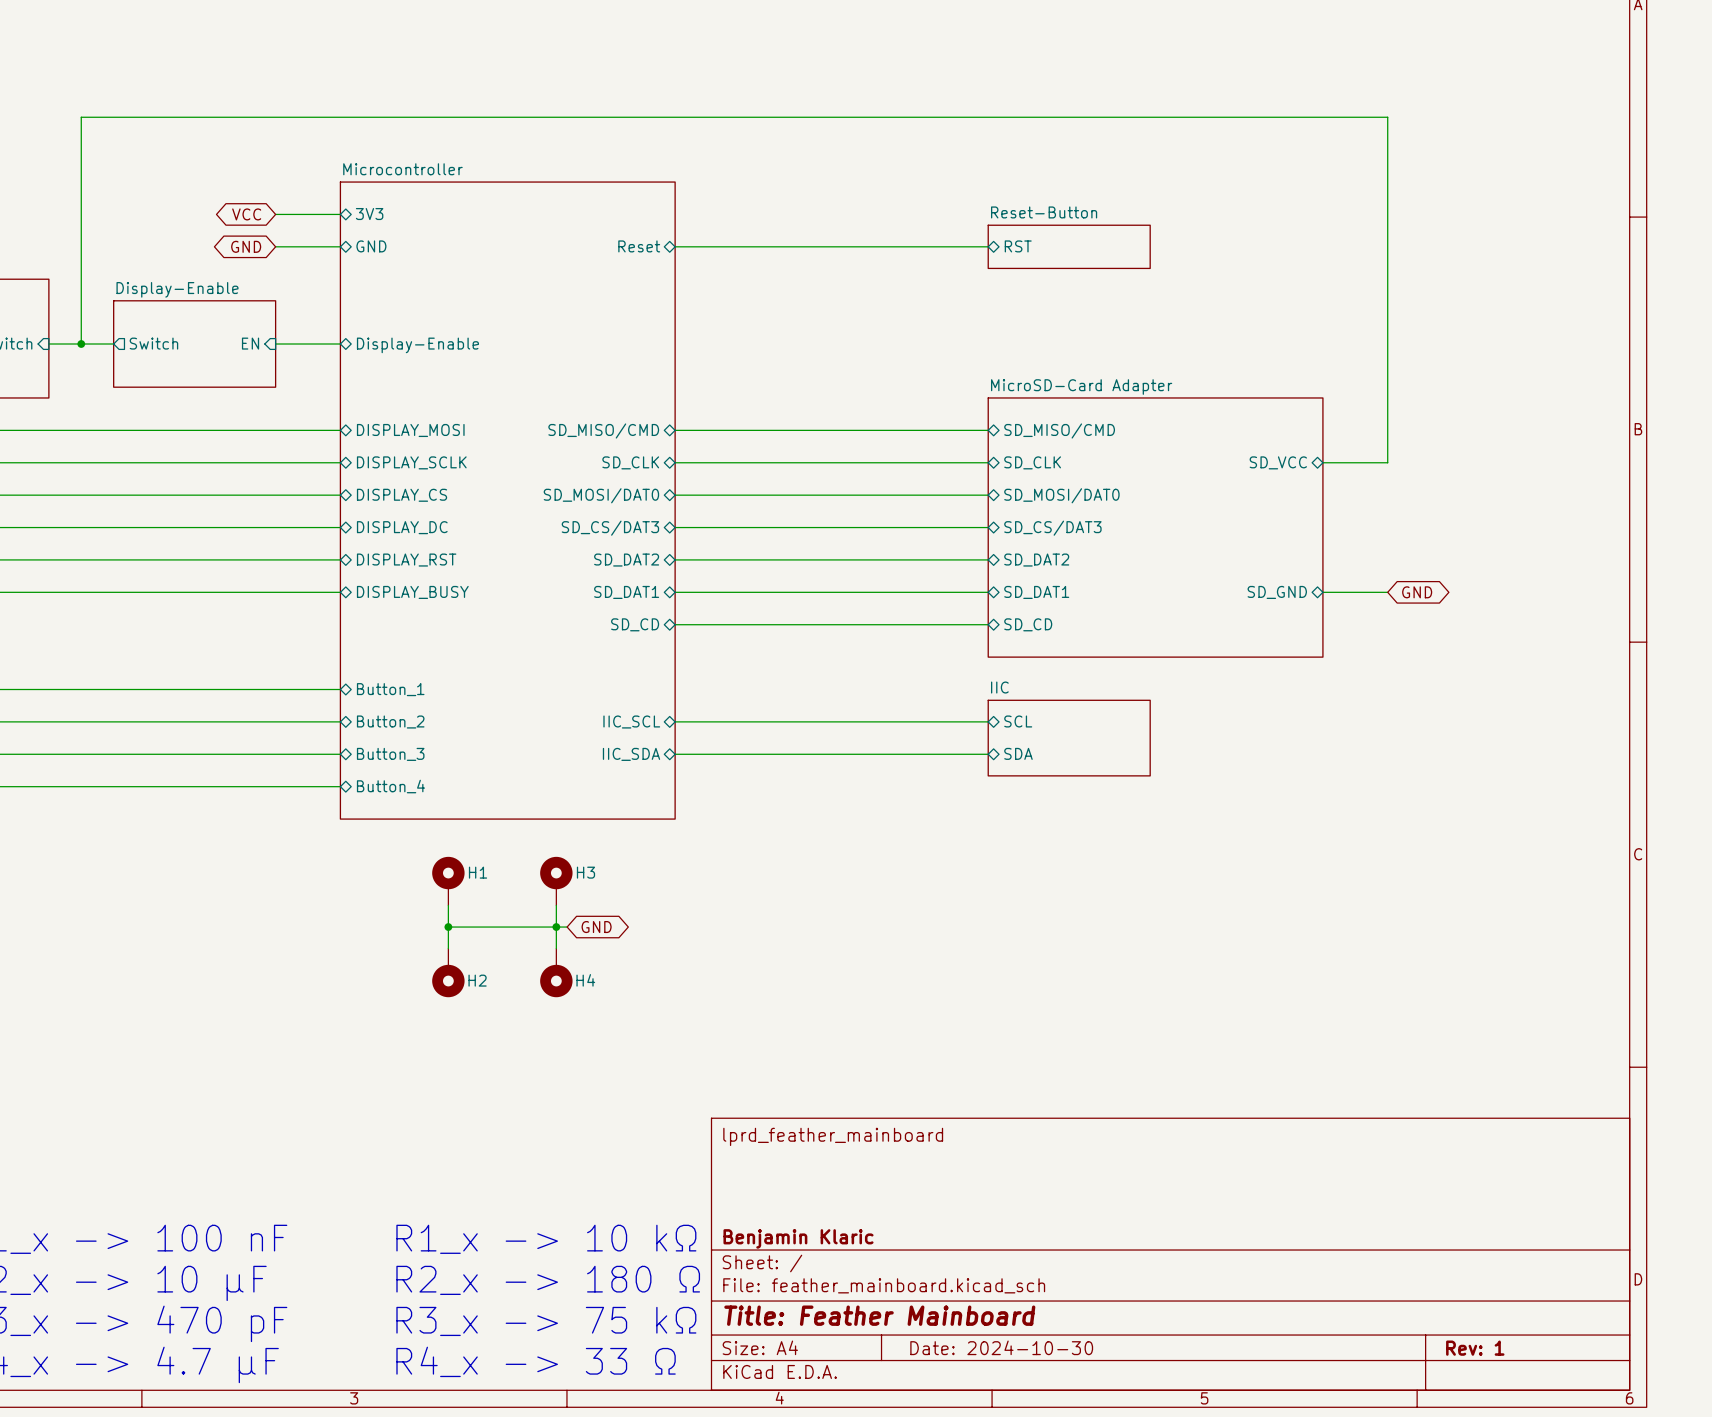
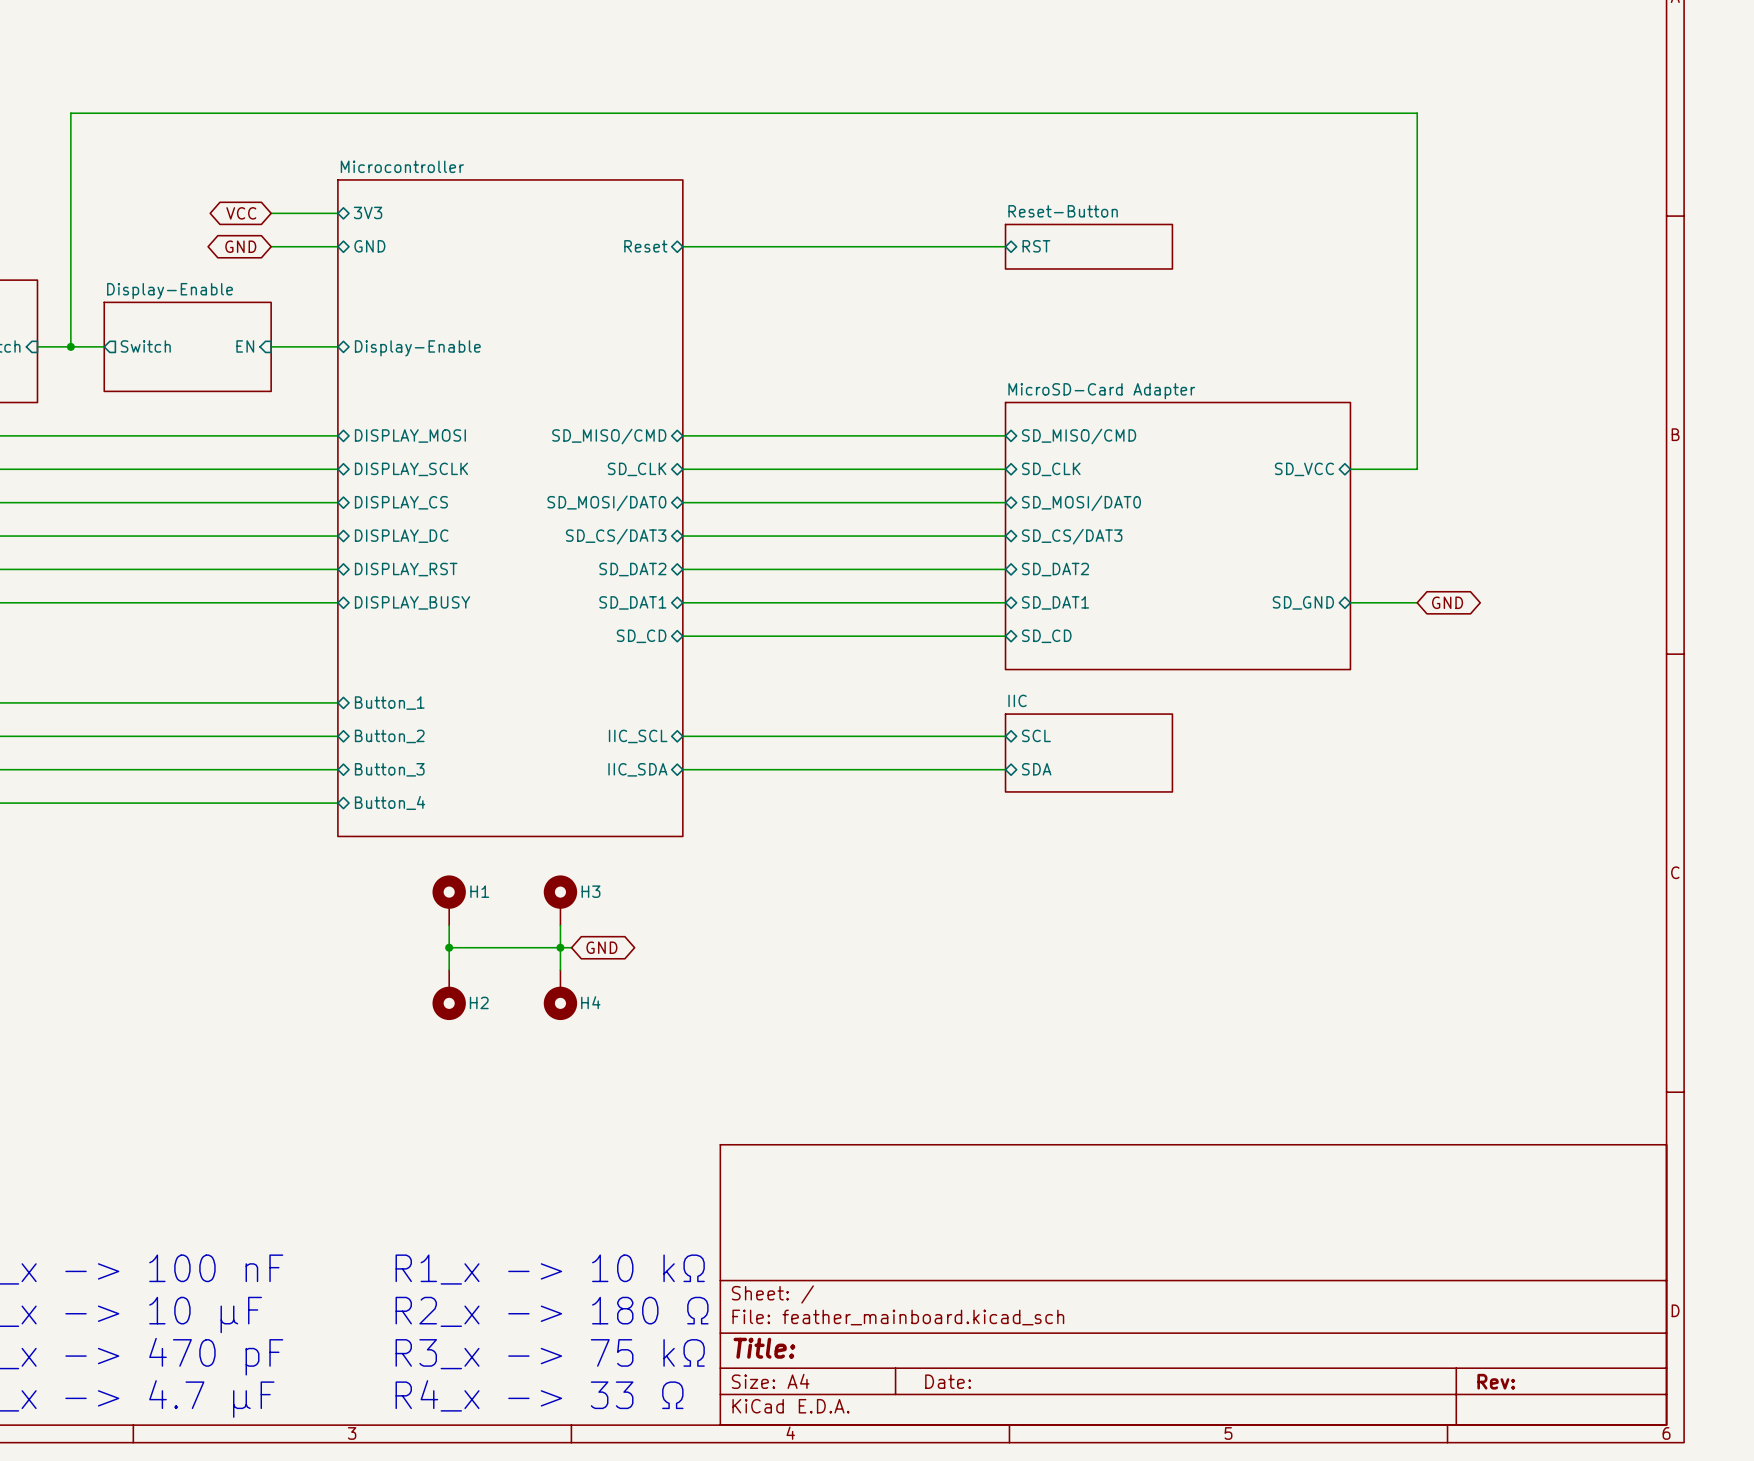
title block: lprd_feather_mainboard (833, 1136) -> none
title block: Benjamin Klaric (798, 1238) -> none
title block: Title: Feather Mainboard (879, 1315) -> Title: (764, 1348)
title block: Date: 2024-10-30 (1001, 1347) -> Date: (948, 1381)
title block: Rev: 1 (1475, 1348) -> Rev: (1496, 1381)

